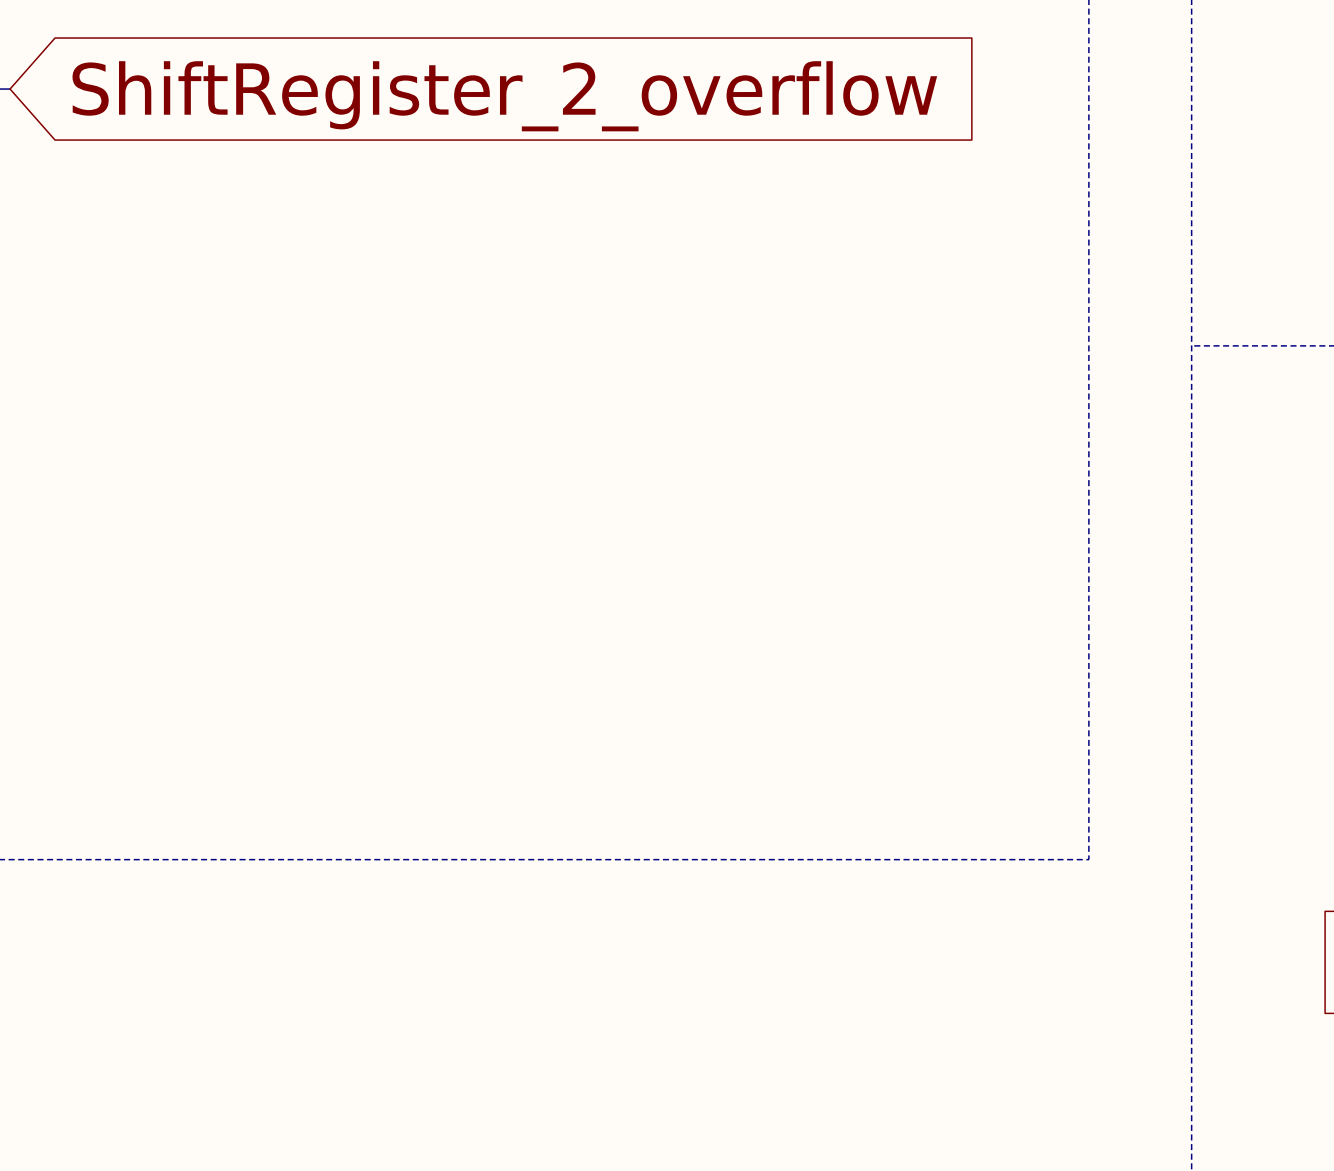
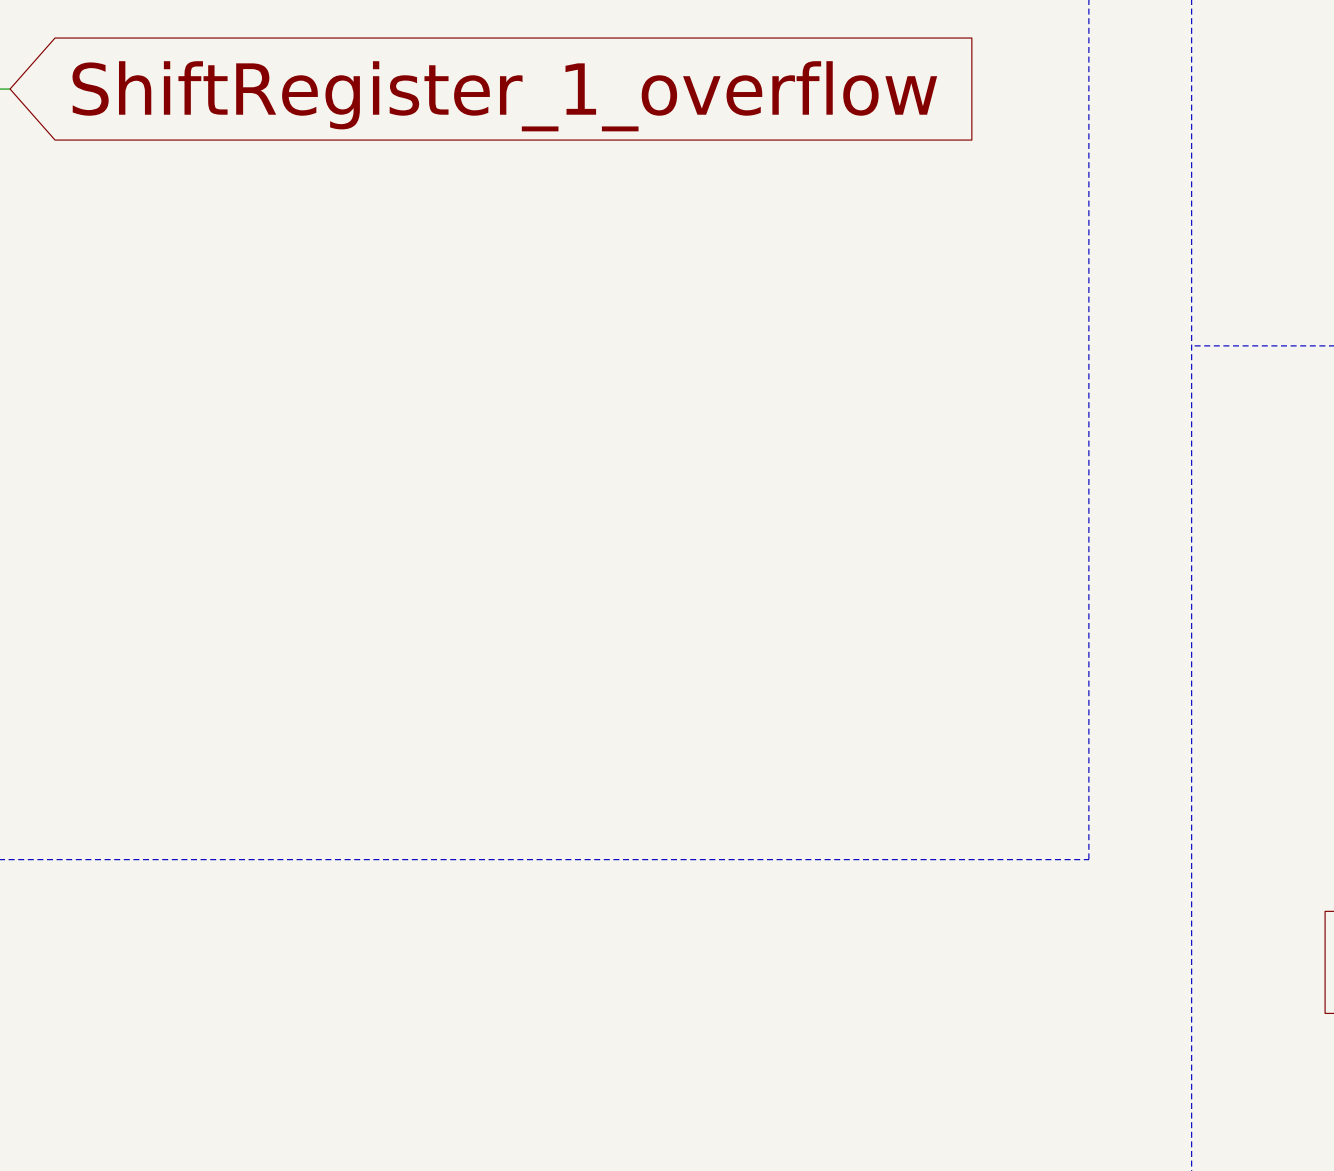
global label: ShiftRegister_2_overflow (504, 96) -> ShiftRegister_1_overflow (504, 96)

